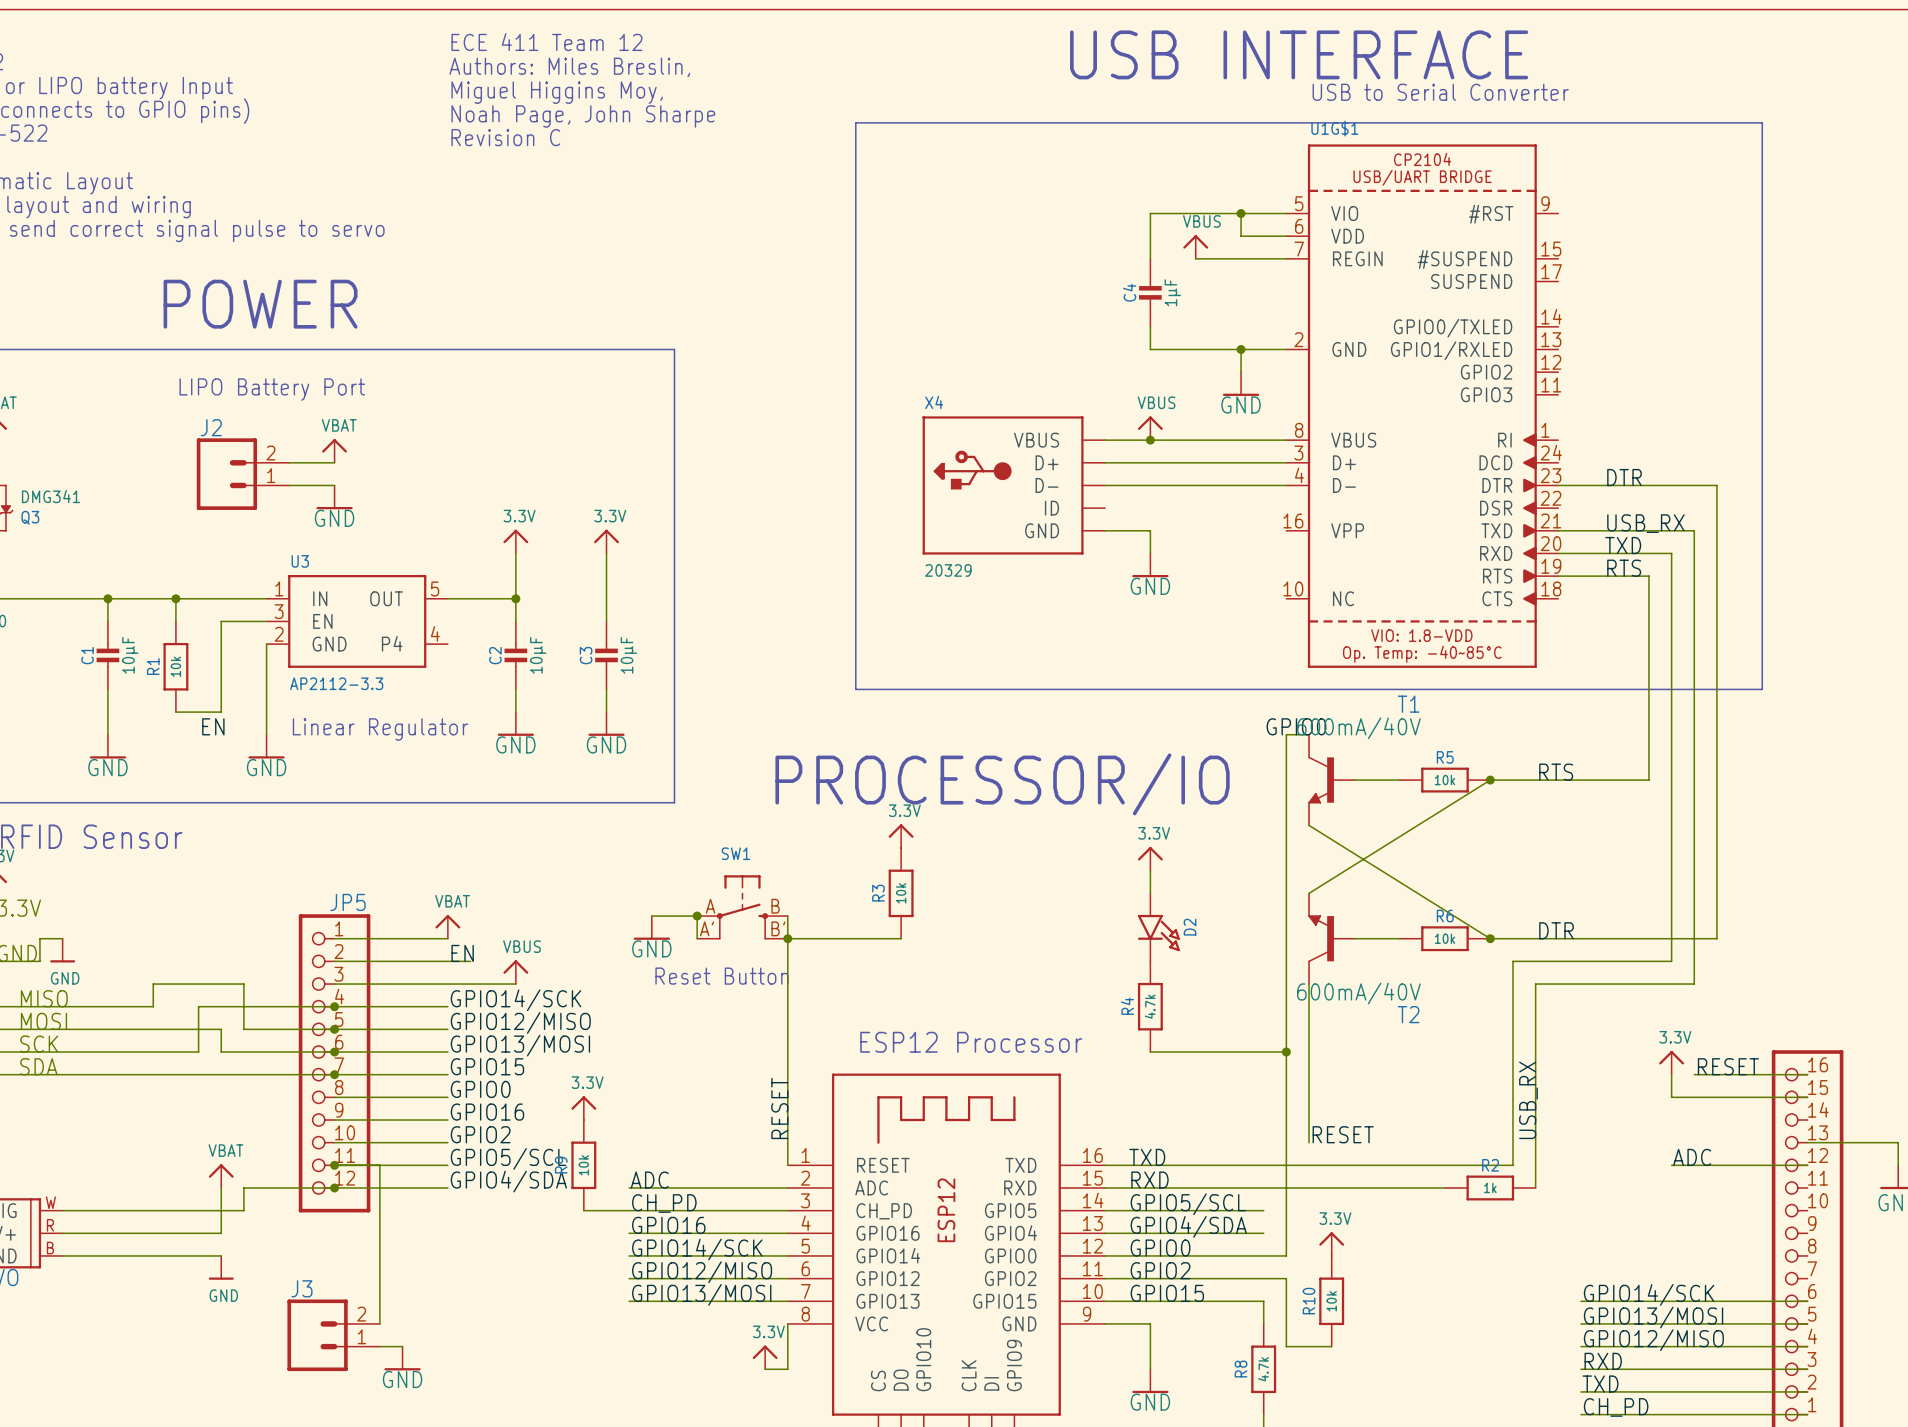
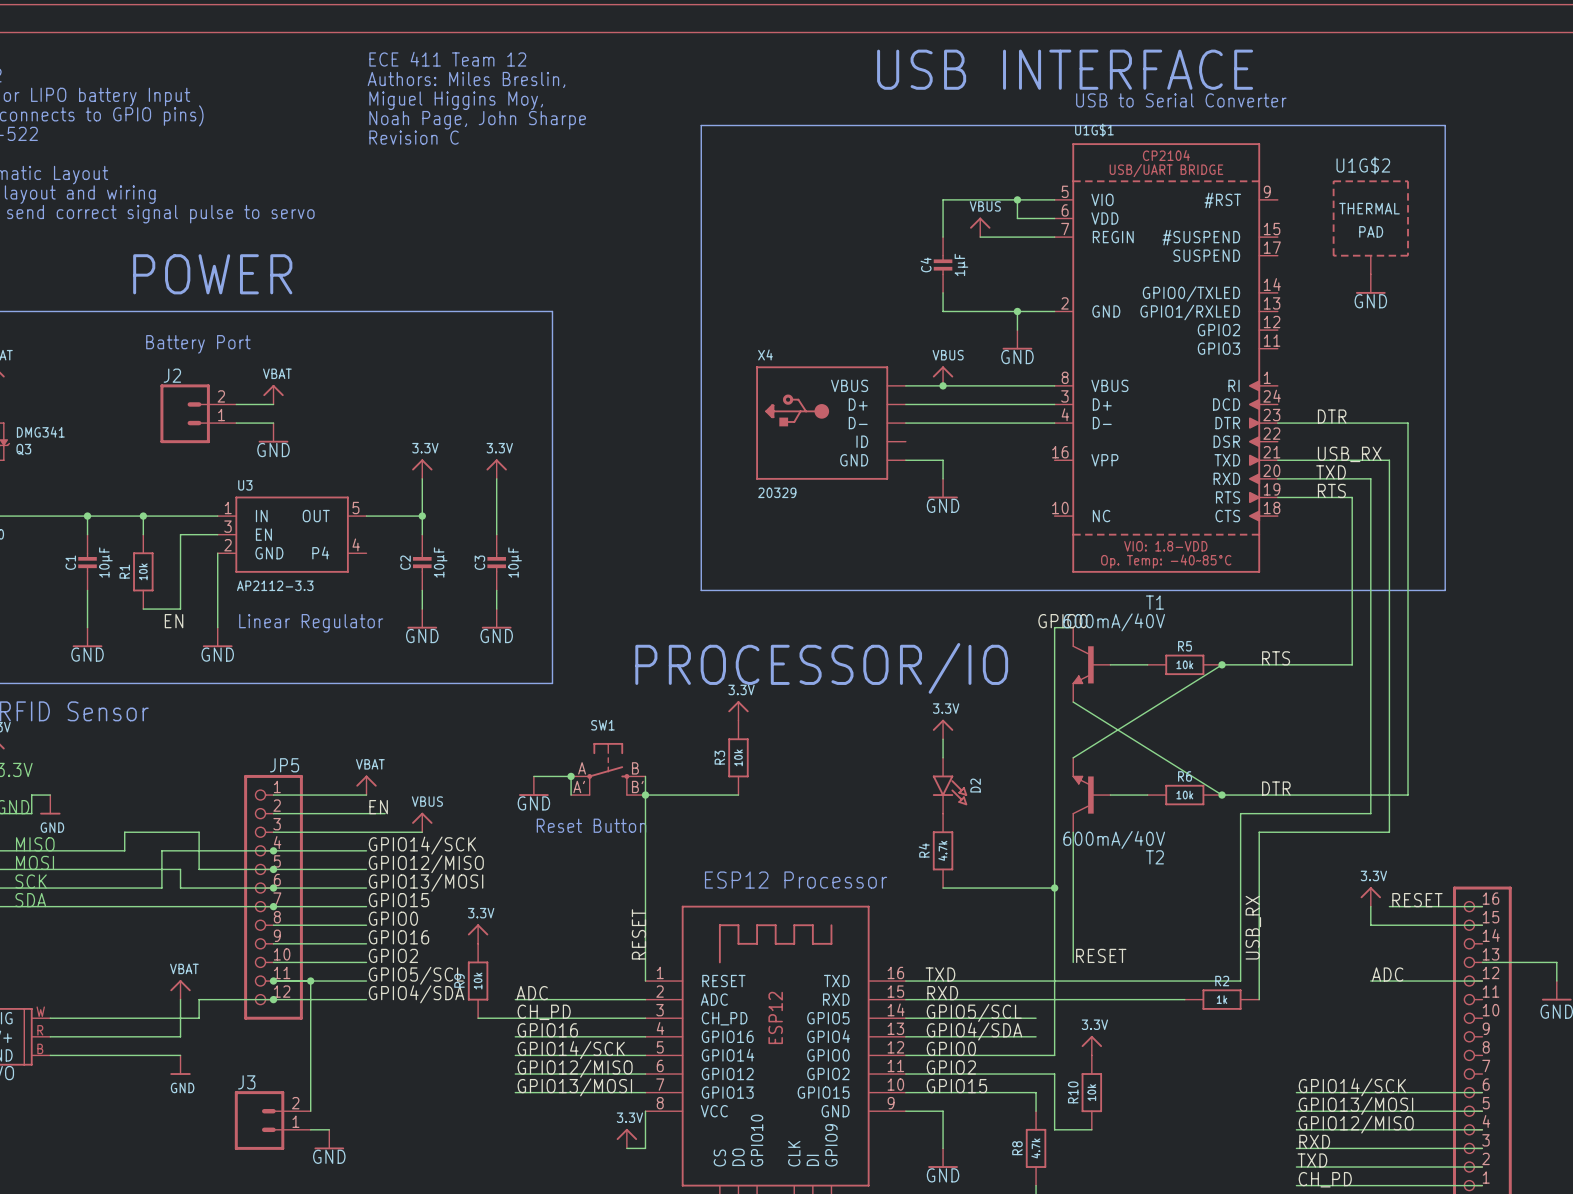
U1G$2: none -> (1370, 227)
power symbol: none -> GND (1370, 284)
text: LIPO Battery Port (272, 389) -> Battery Port (198, 344)
junction: none -> (310, 981)

